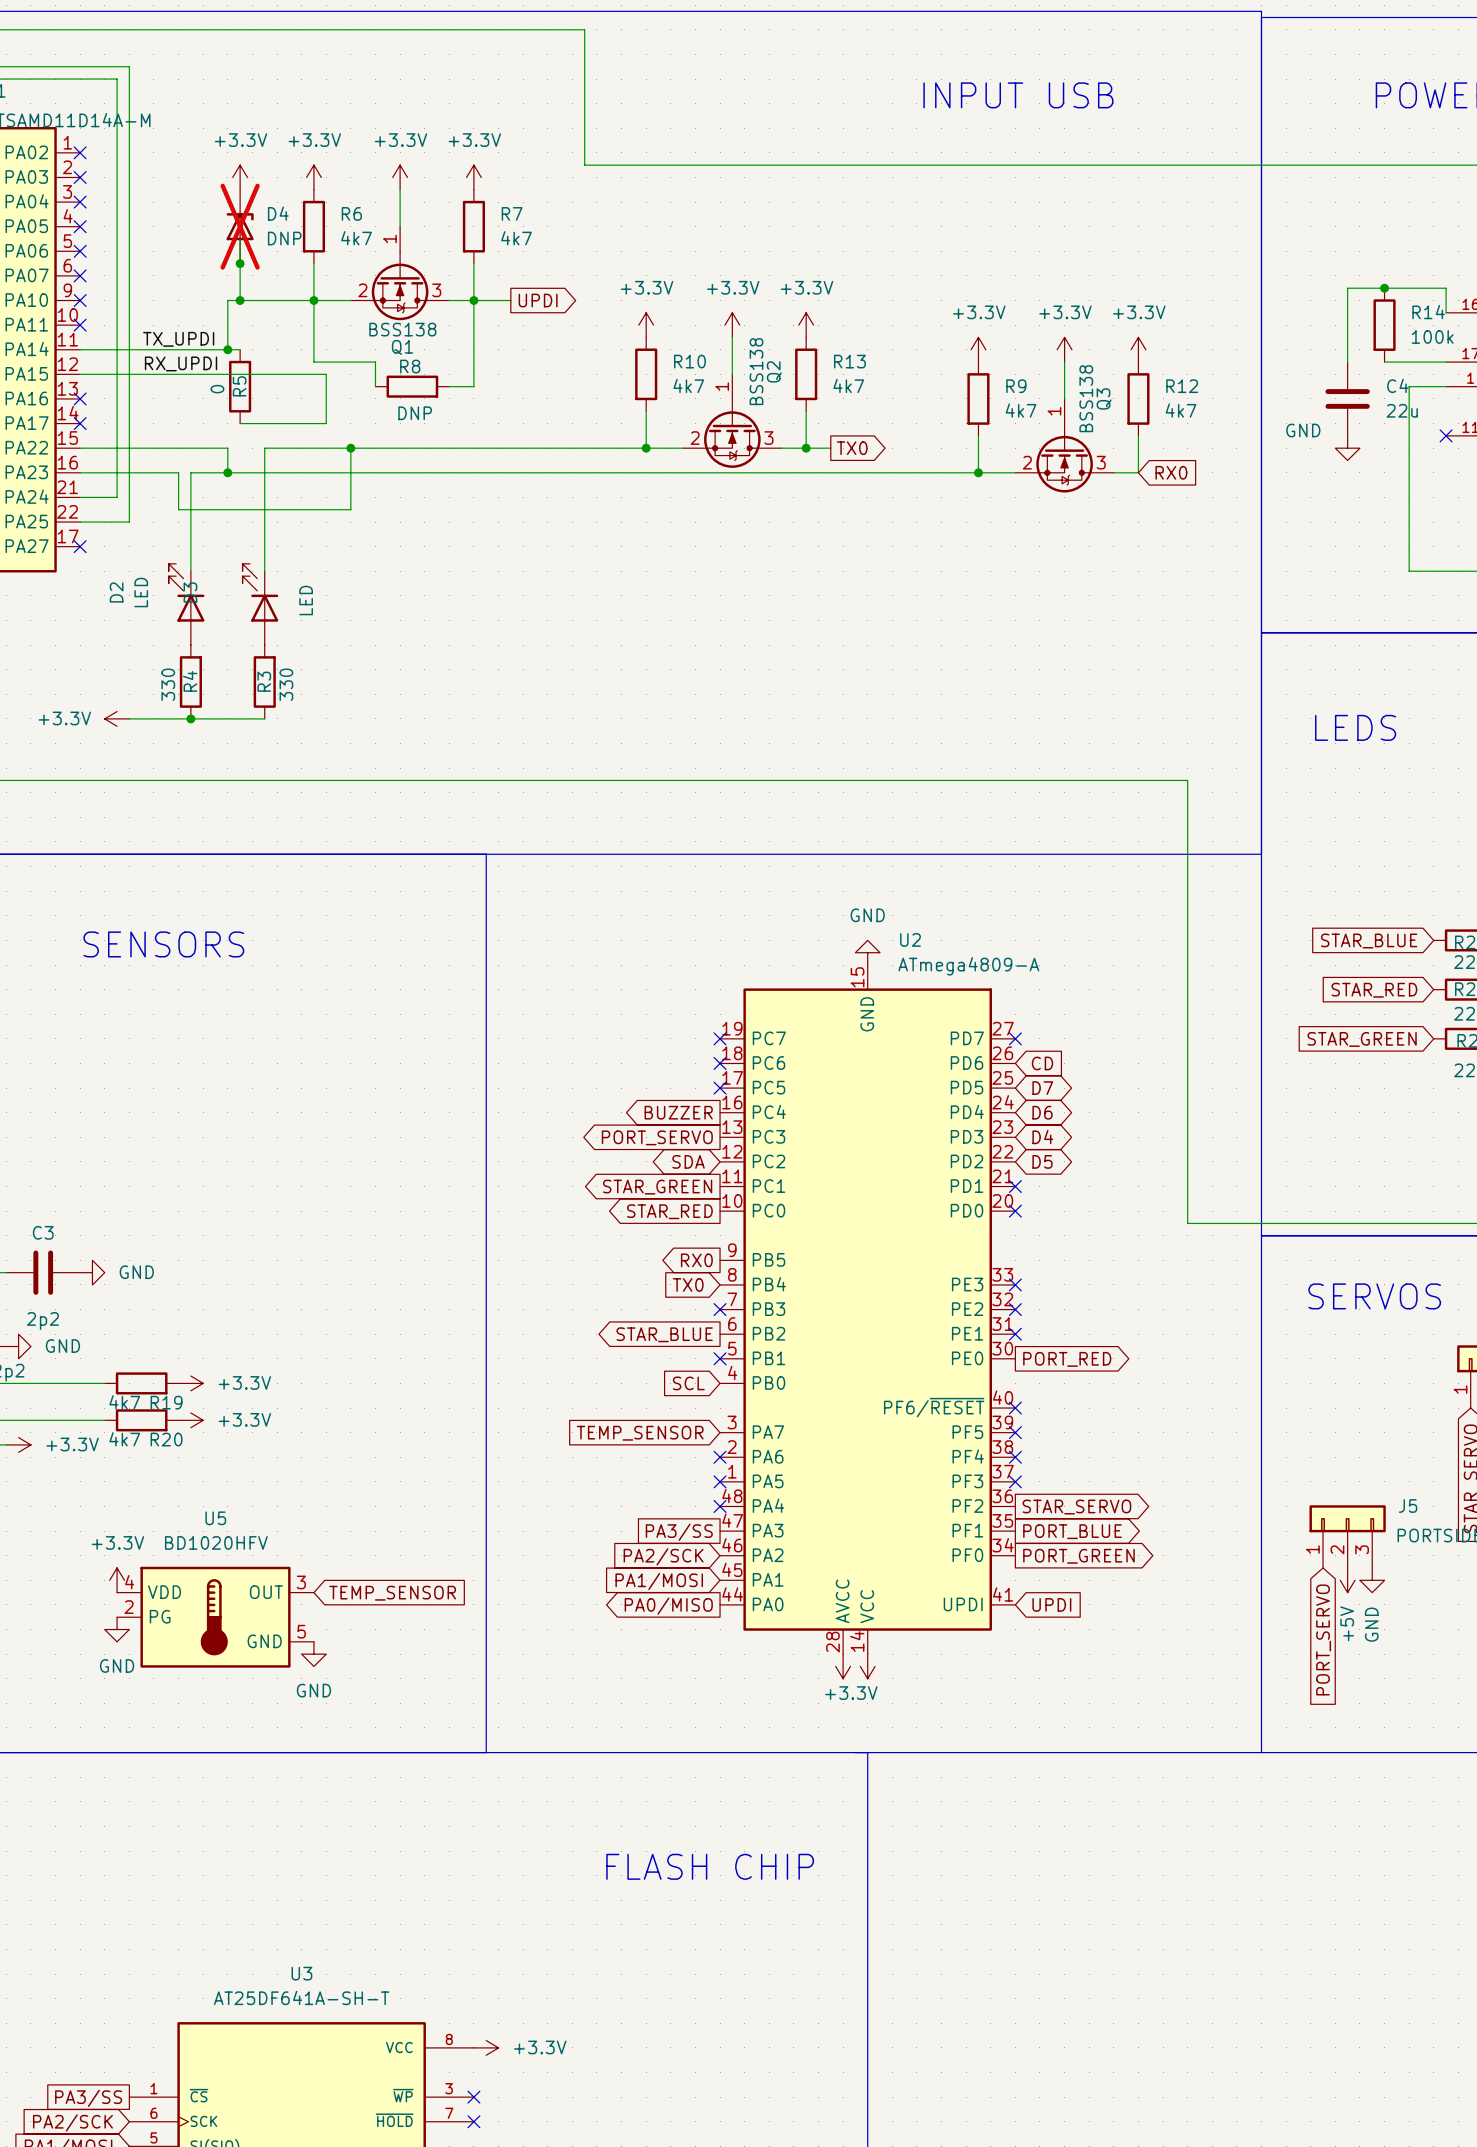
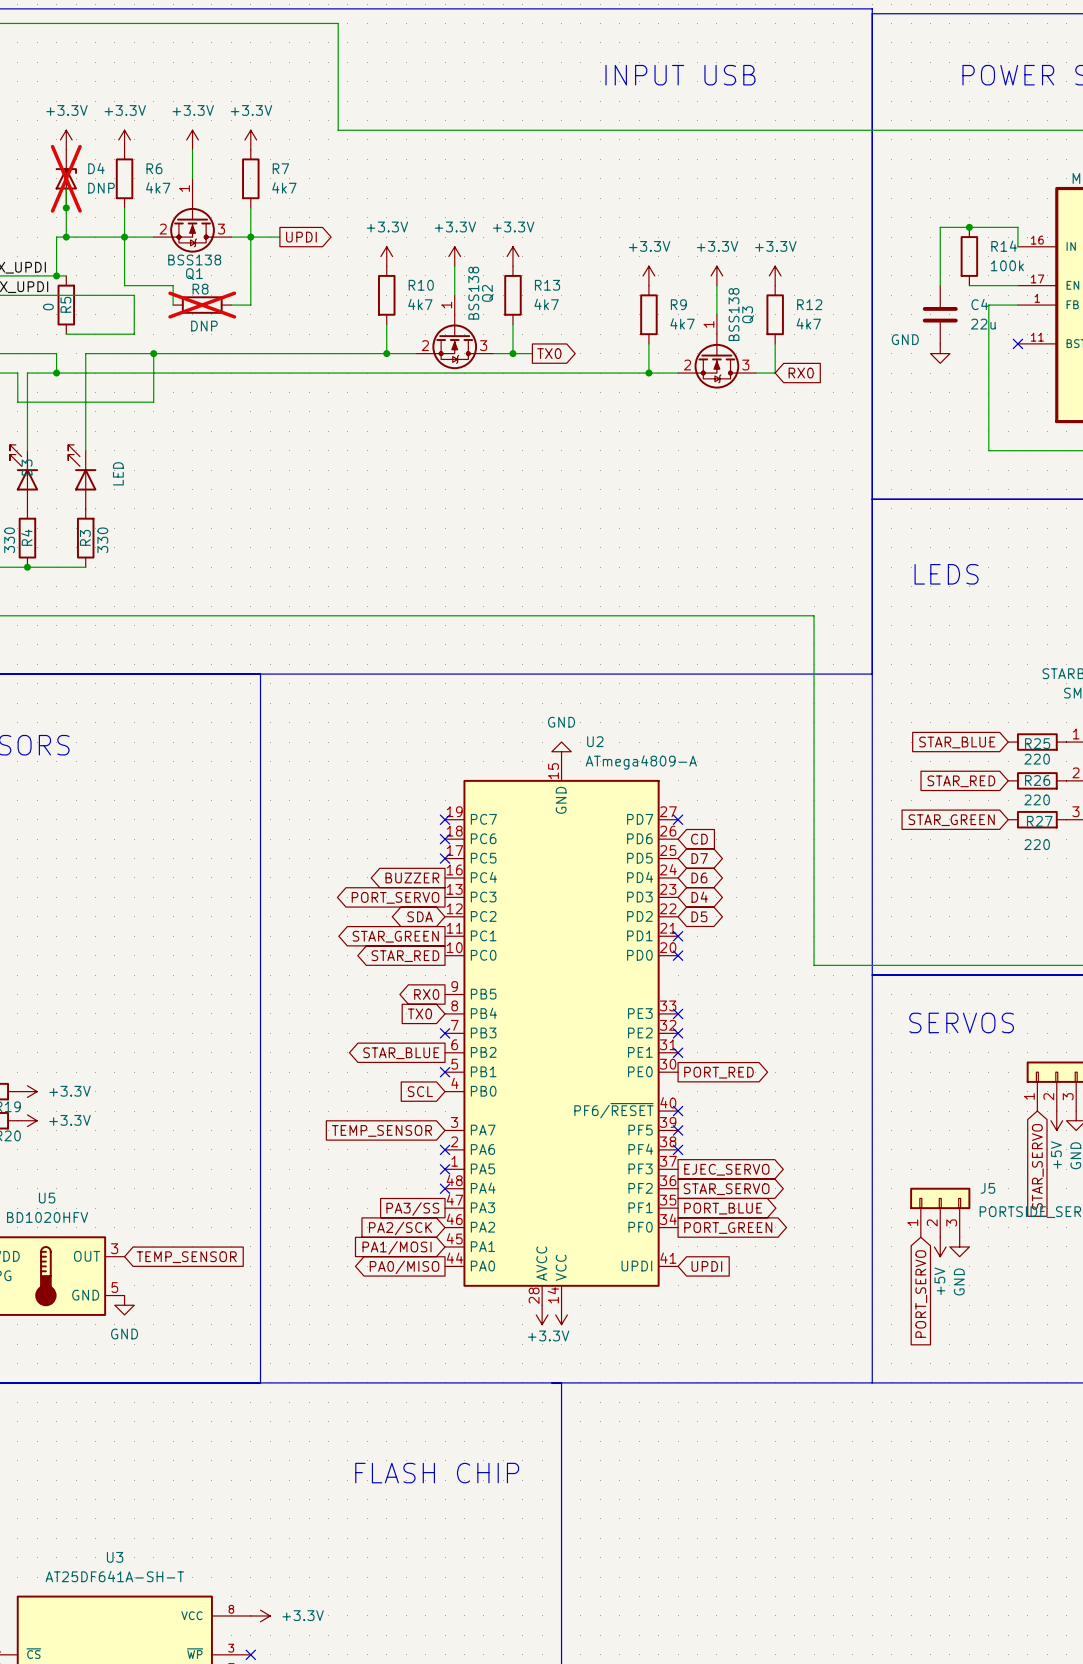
R8 do-not-place cross: none -> (202, 305)
no-connect mark: (1015, 1481) -> none
global label: none -> EJEC_SERVO (726, 1169)

